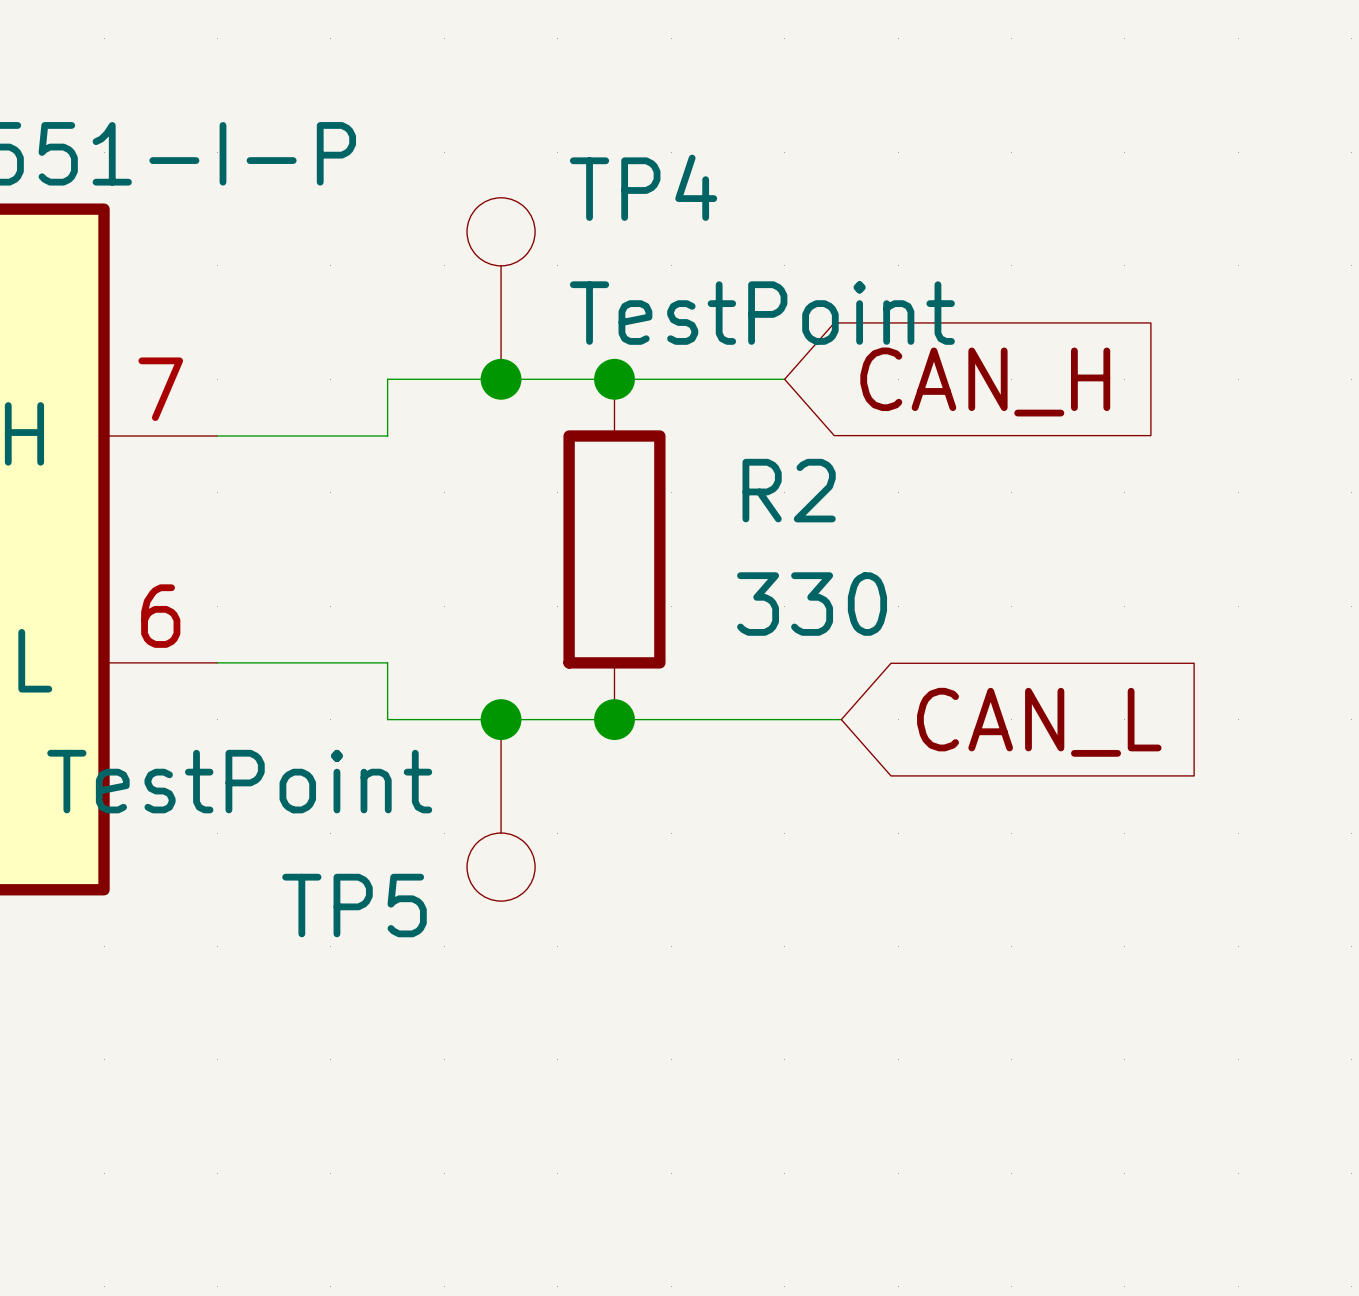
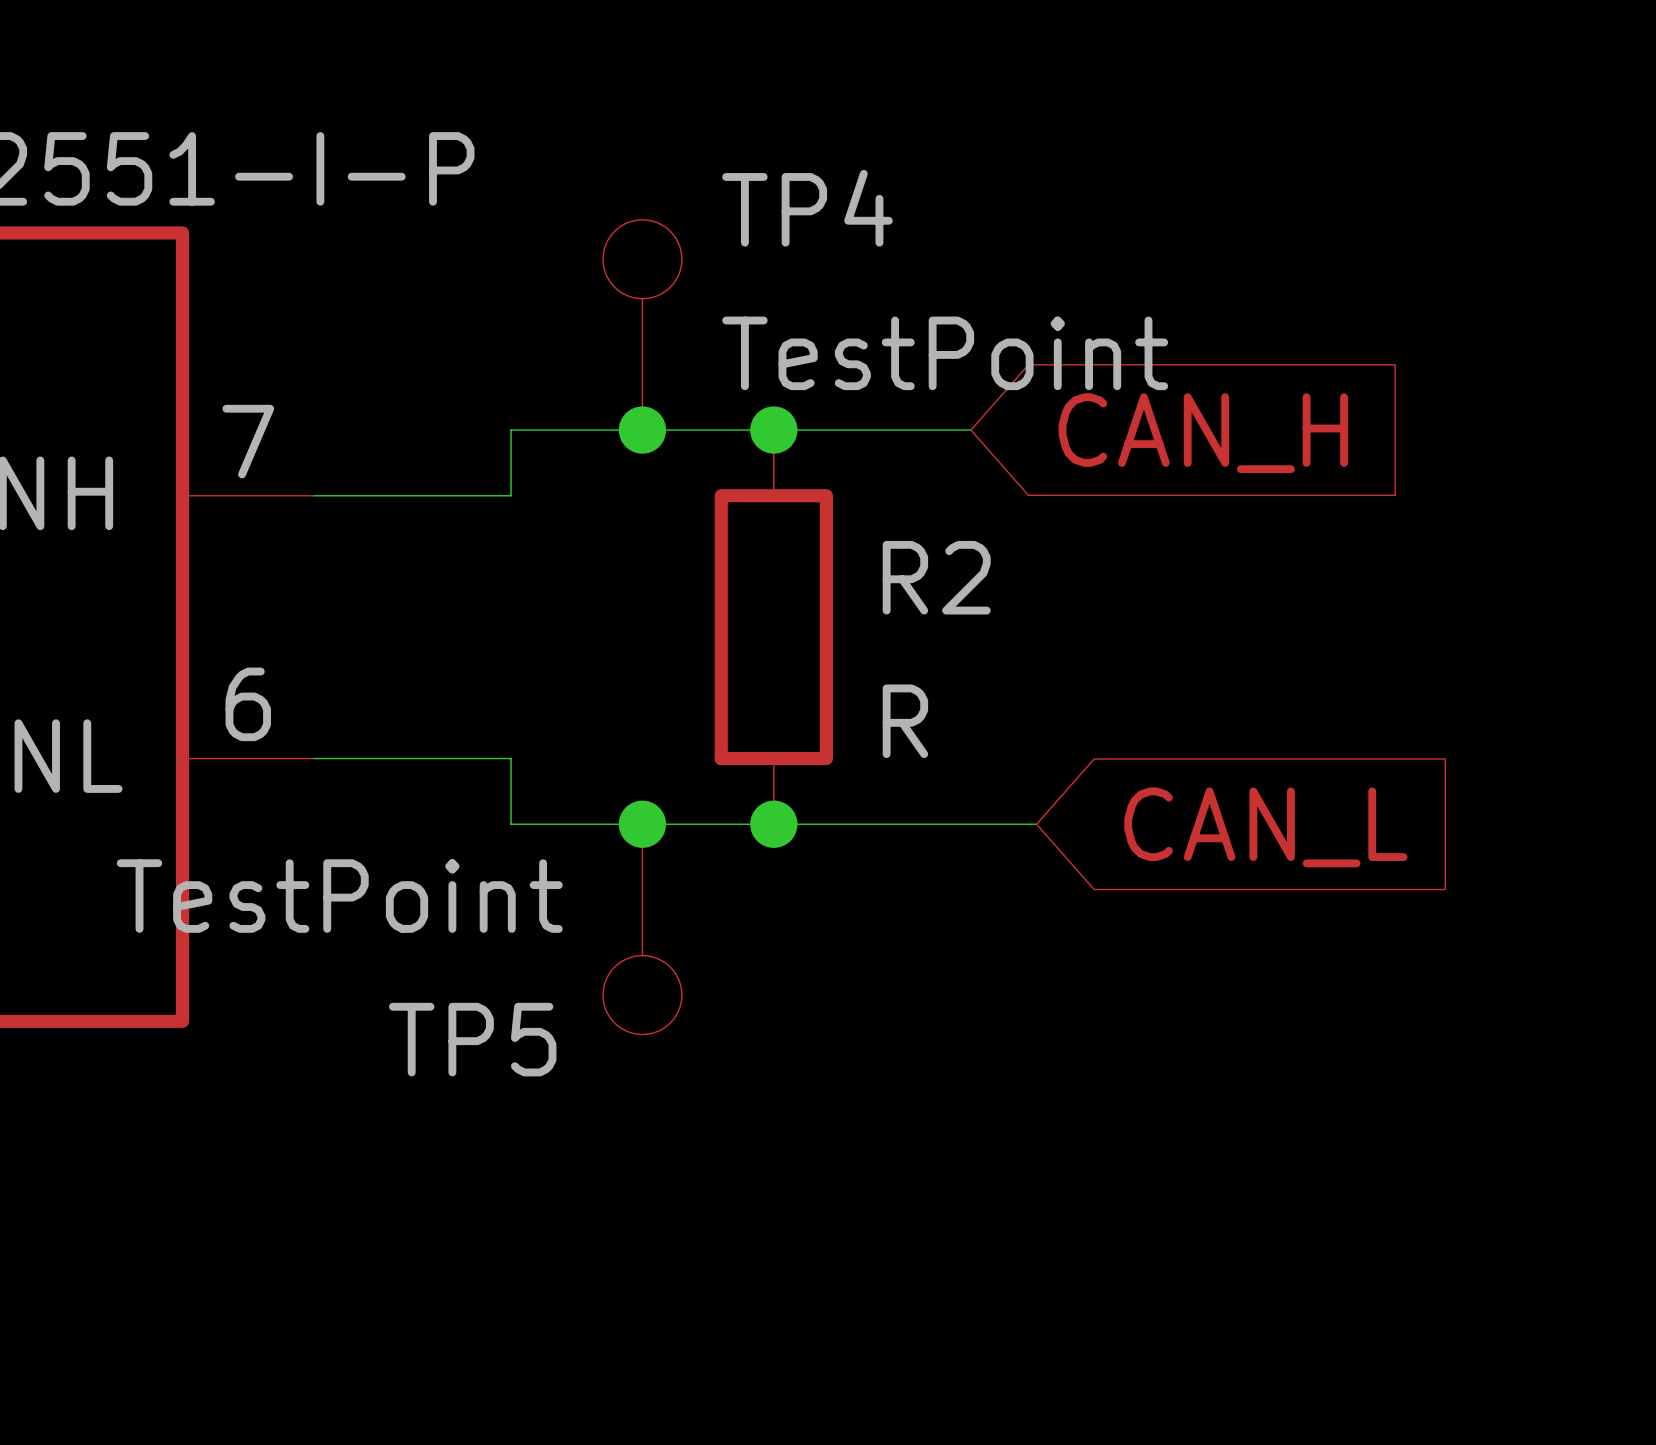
R2 name position: R2 (789, 490) -> R2 (936, 577)
R2 value: 330 (812, 604) -> R (905, 721)

